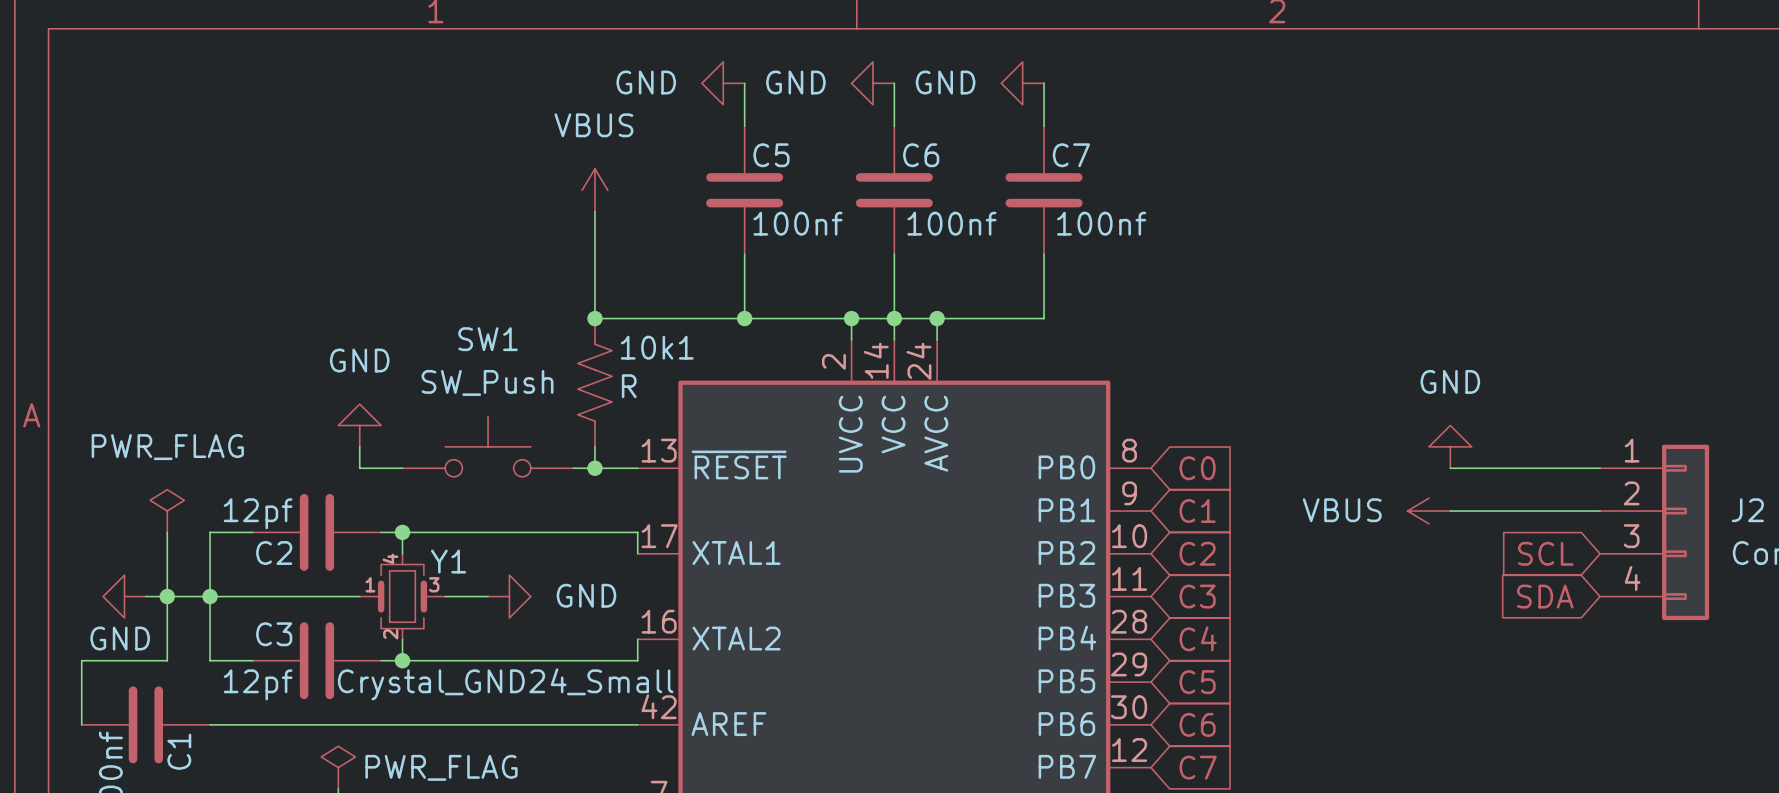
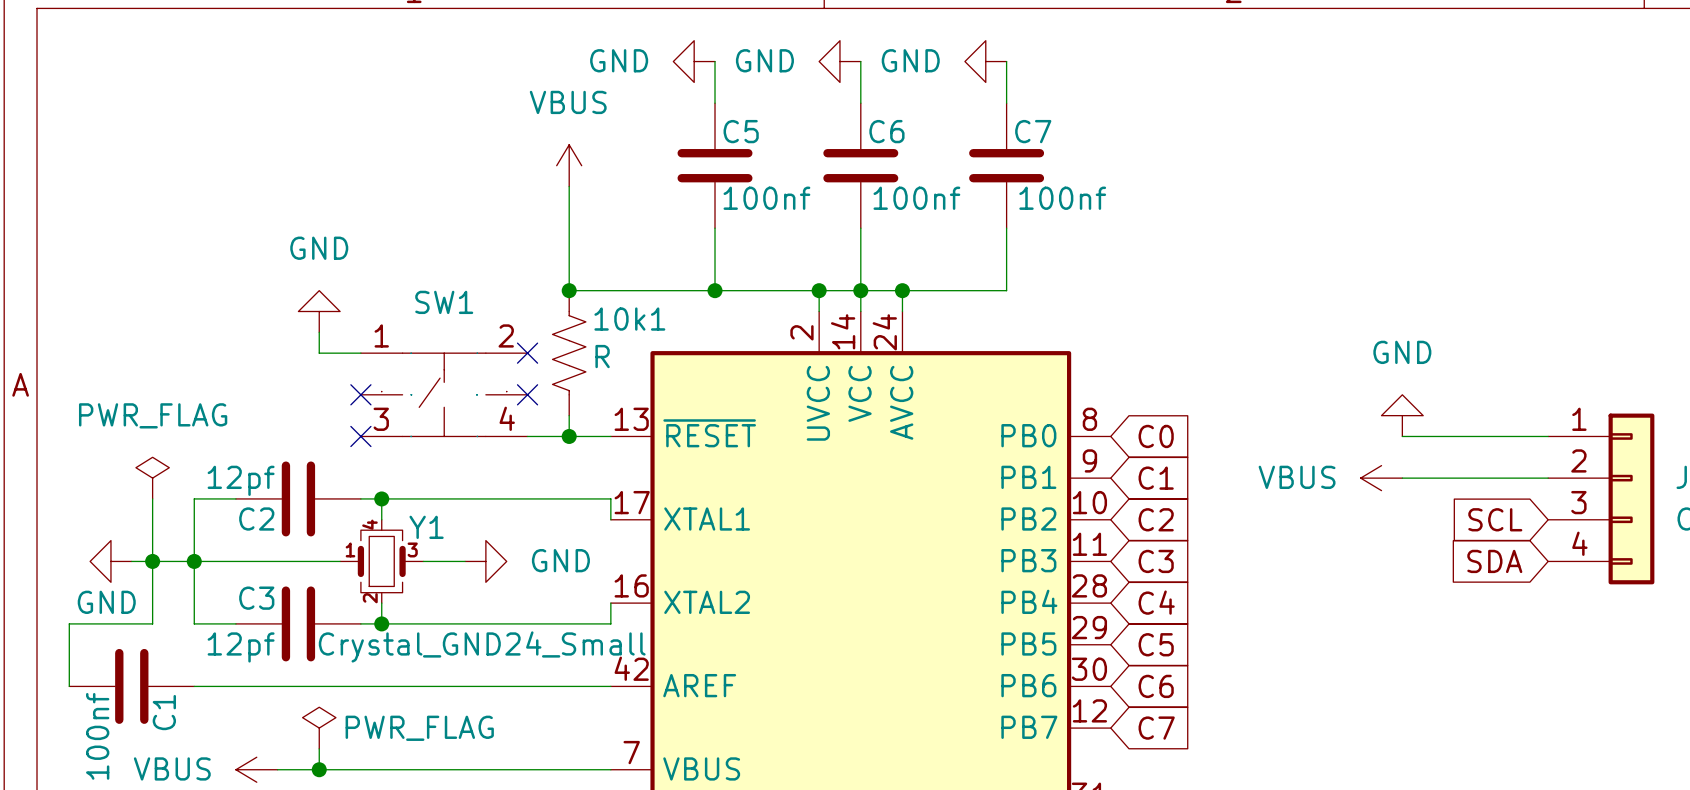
SW1 value: SW_Push (487, 382) -> none
no-connect mark: none -> (527, 353)
SW1 symbol: [402, 416, 574, 477] -> [360, 353, 528, 437]
power symbol position: GND (359, 425) -> GND (319, 311)
no-connect mark: none -> (360, 394)
no-connect mark: none -> (527, 394)
wire: (359, 446) (359, 468) (402, 468) -> (319, 332) (319, 353) (360, 353)
no-connect mark: none -> (360, 436)

